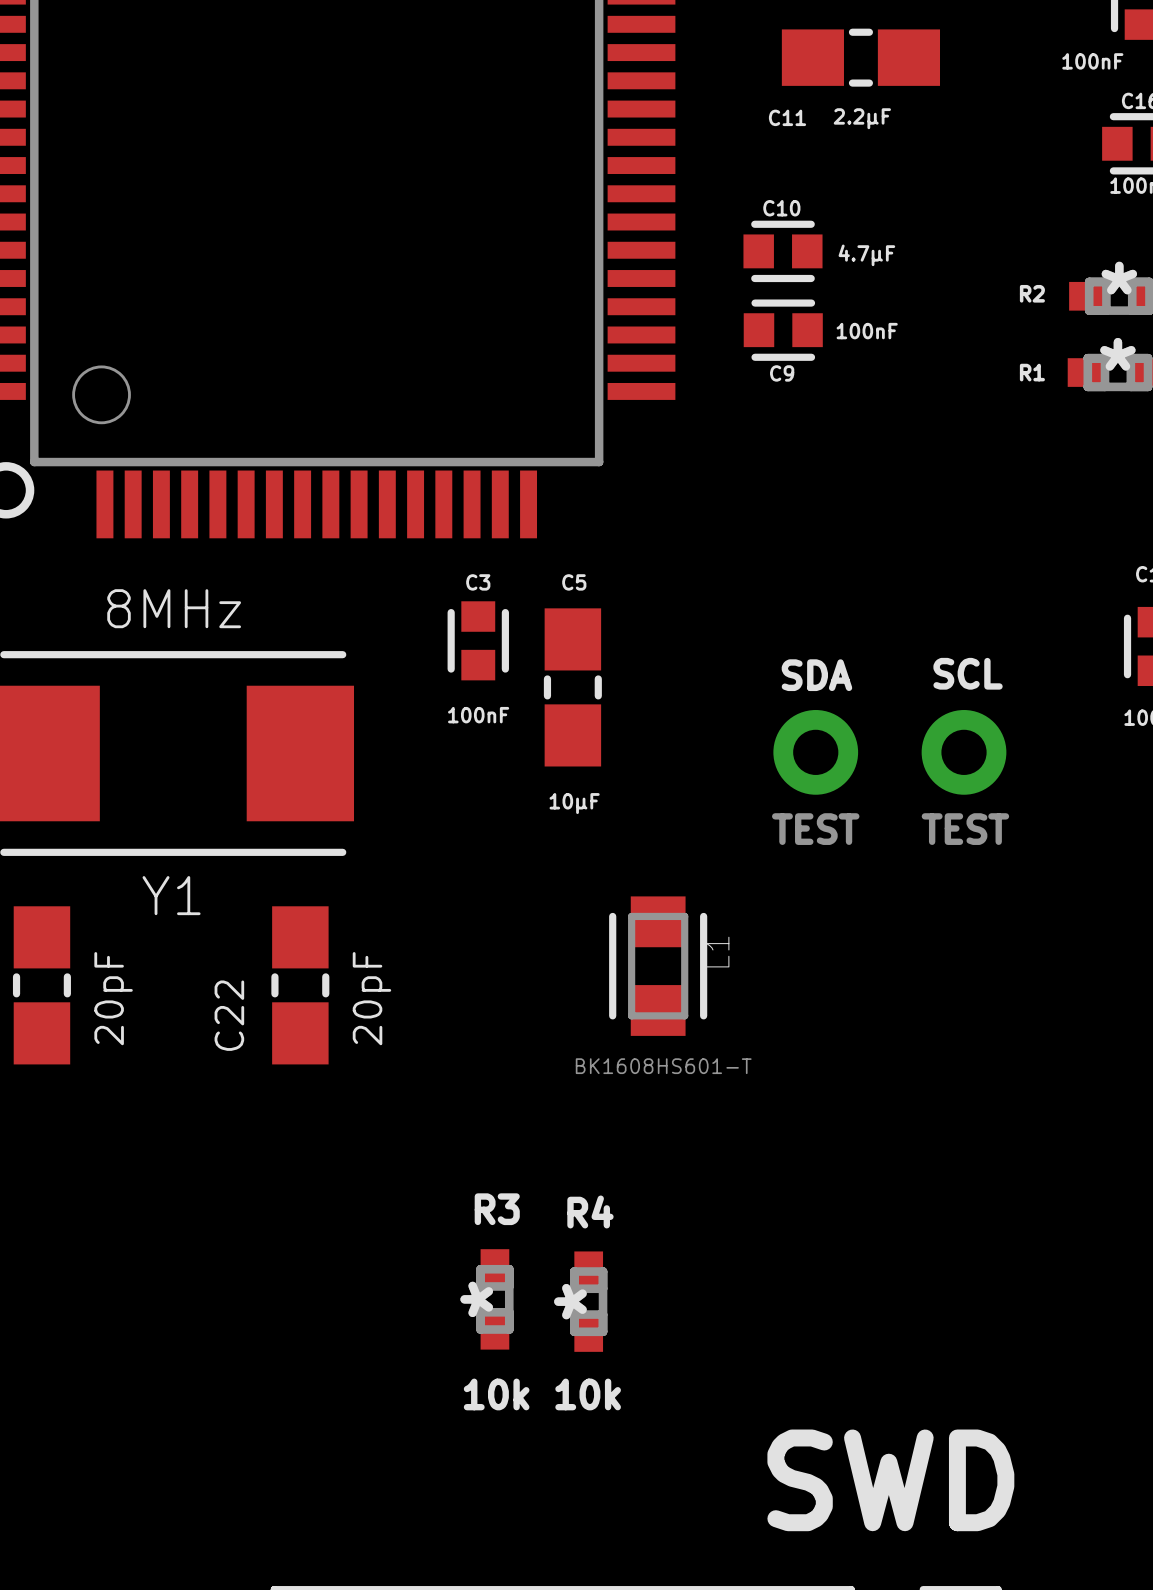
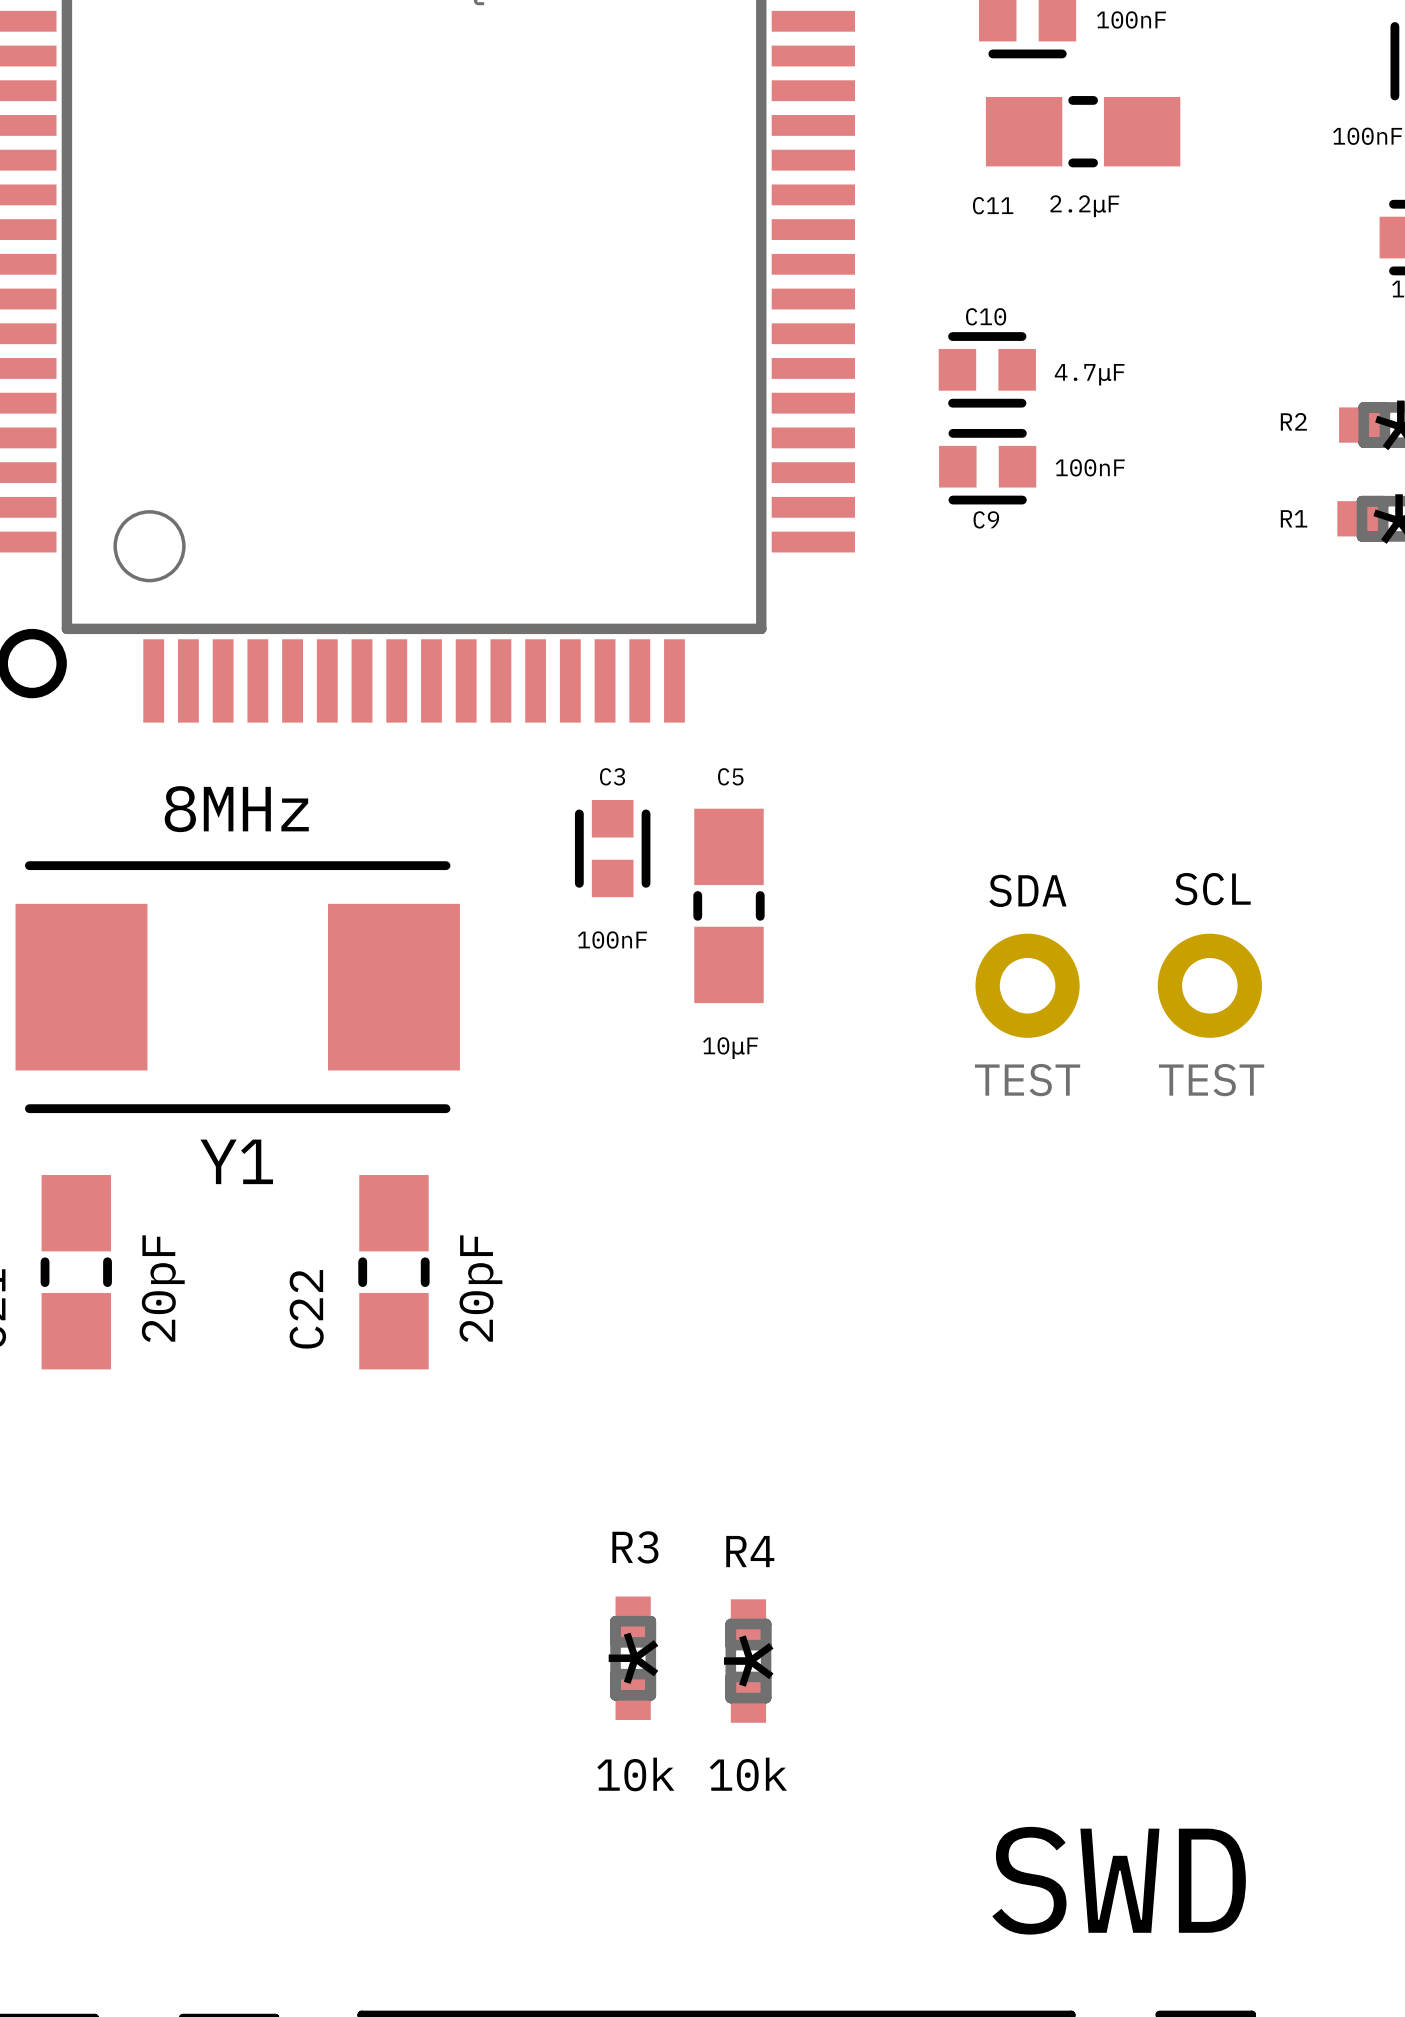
L1: BK1608HS601-T (658, 966) -> none

